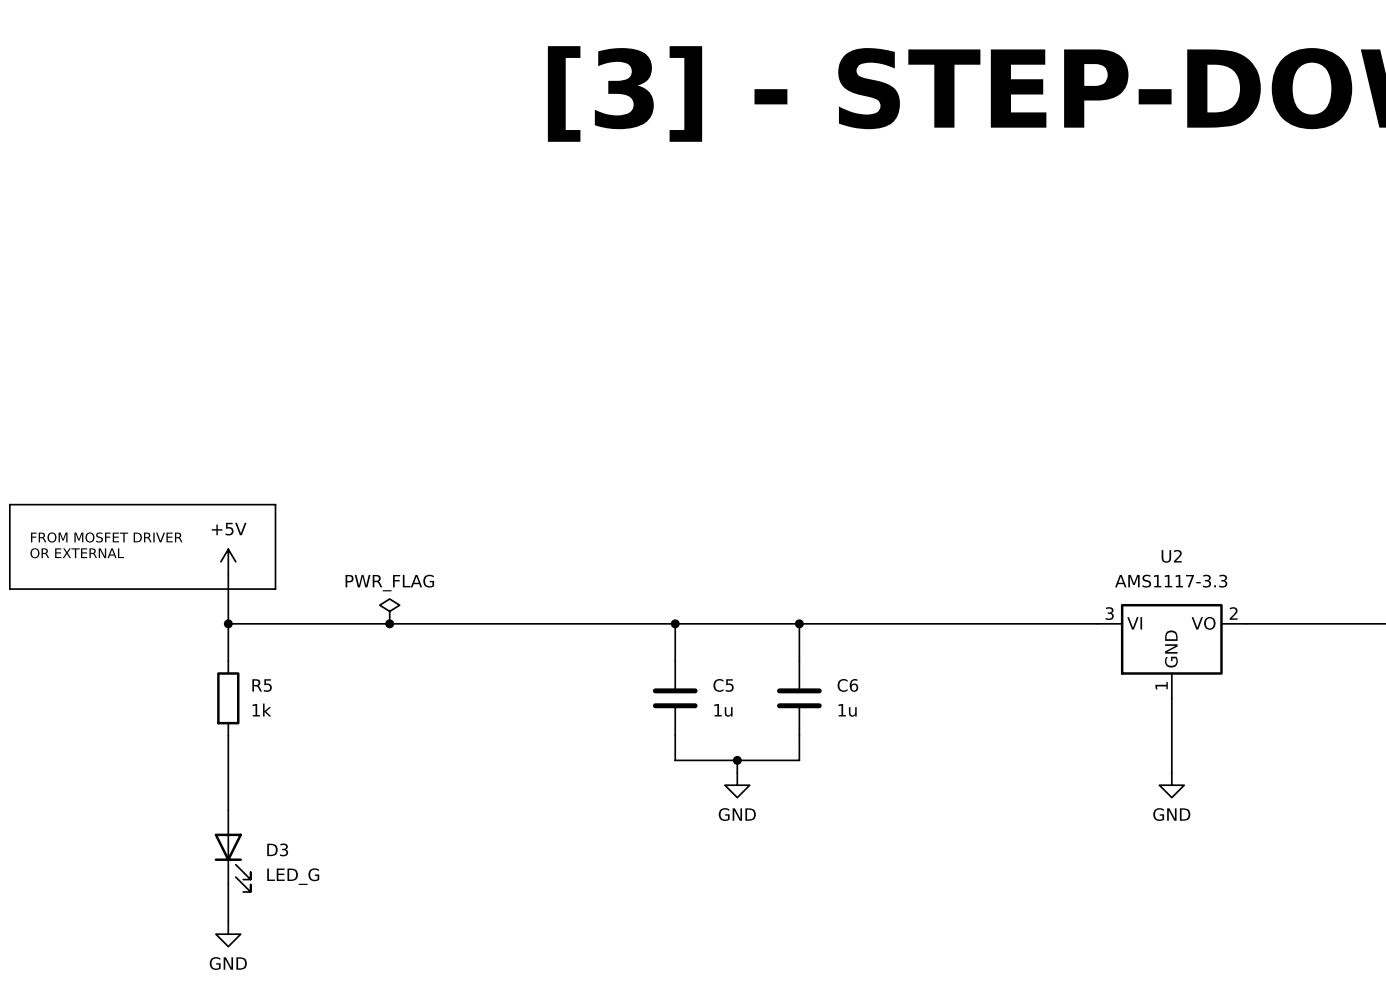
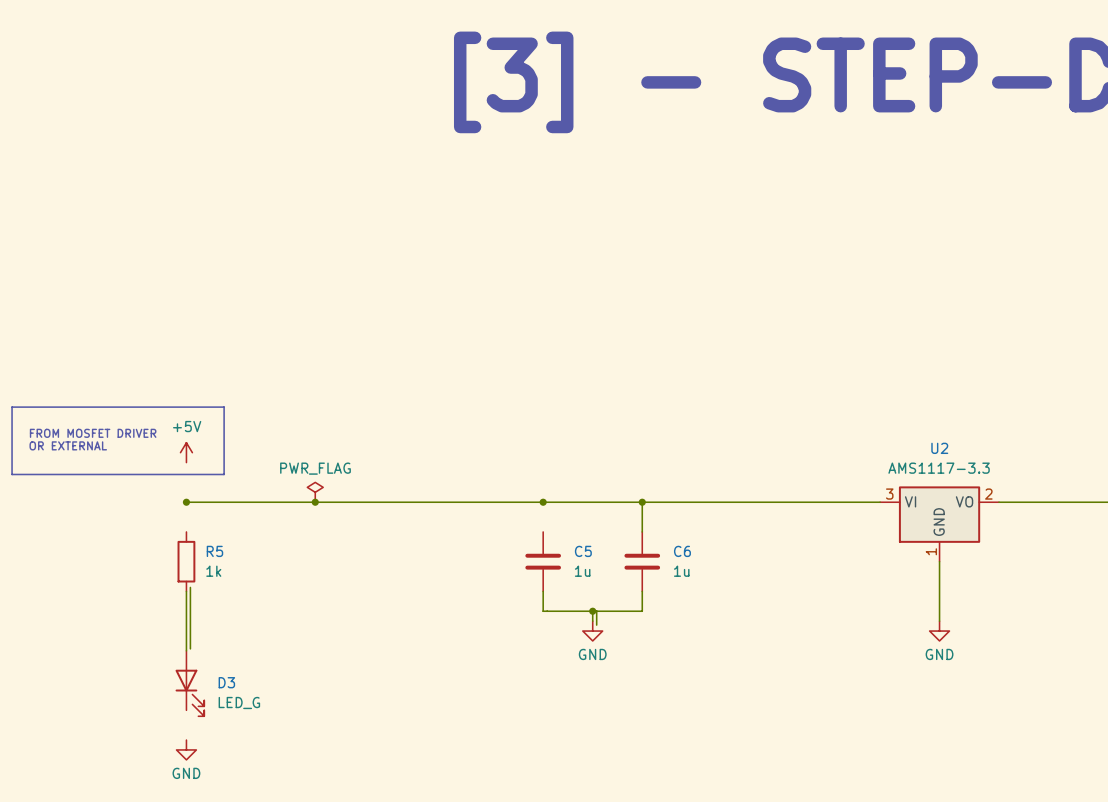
wire: (228, 574) (228, 661) -> none
wire: (675, 623) (675, 661) -> none
wire: none -> (190, 587) (190, 648)
wire: none -> (596, 611) (596, 625)
wire: (228, 884) (228, 921) -> none

